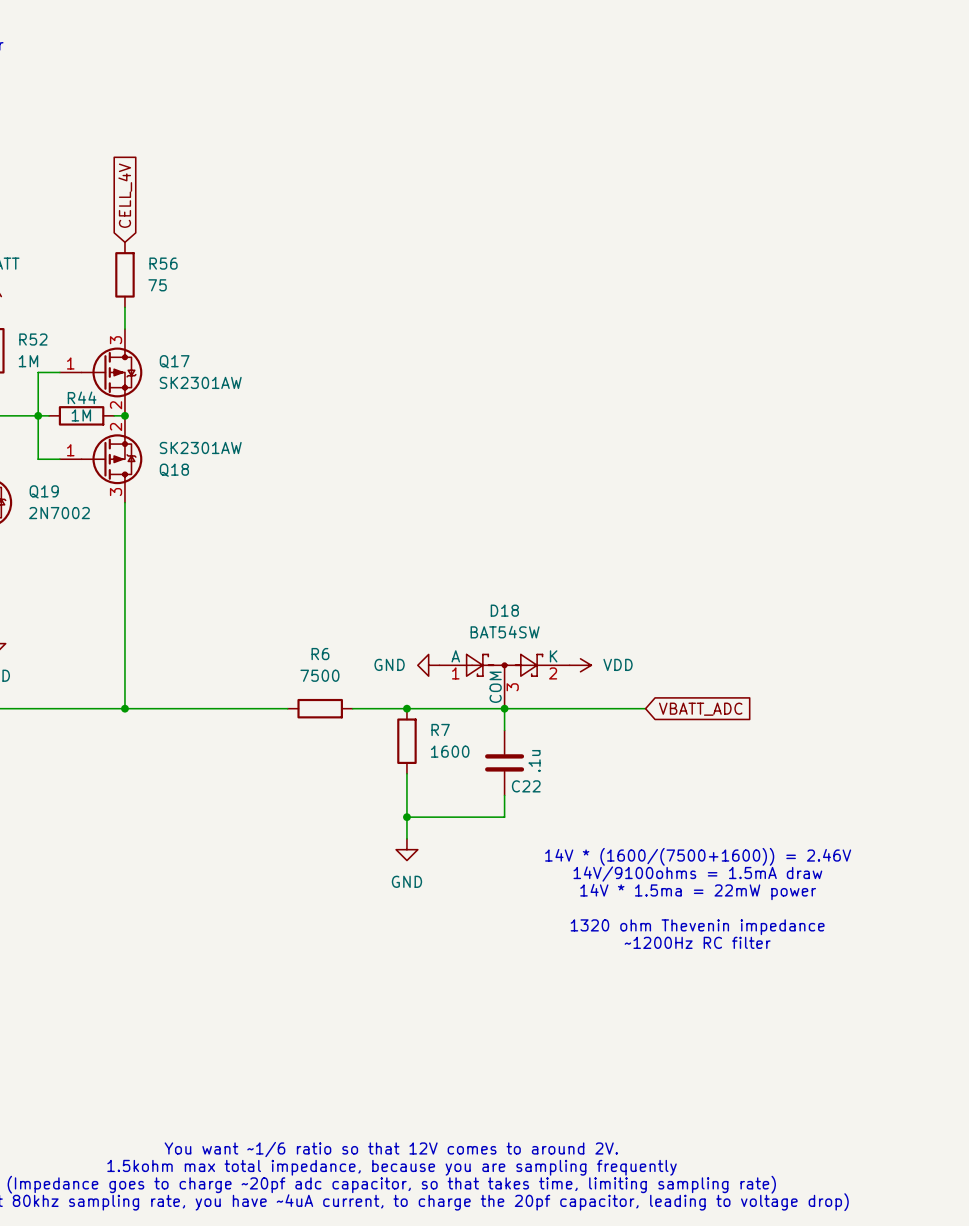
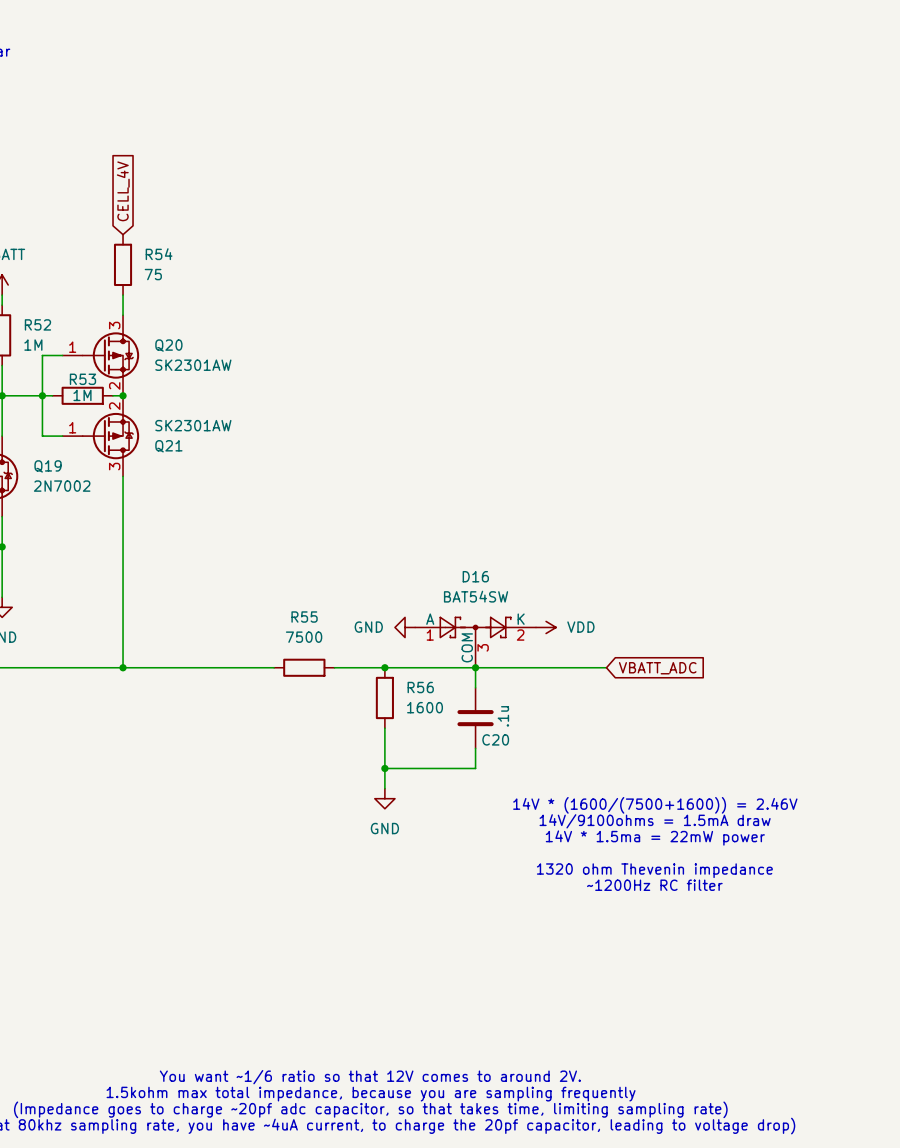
R56 name: R56 (163, 263) -> R54 (159, 254)
Q17 name: Q17 (174, 361) -> Q20 (168, 345)
R44 name: R44 (82, 397) -> R53 (82, 379)
Q18 name: Q18 (174, 470) -> Q21 (168, 446)
D18 name: D18 (504, 610) -> D16 (475, 576)
R6 name: R6 (320, 654) -> R55 (304, 617)
R7 name: R7 (440, 729) -> R56 (420, 687)
C22 name: C22 (526, 786) -> C20 (495, 739)

